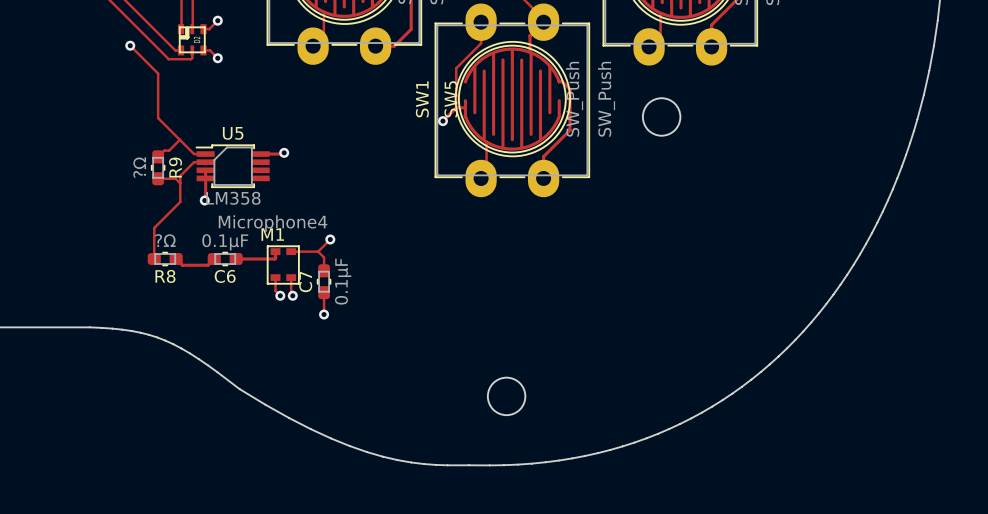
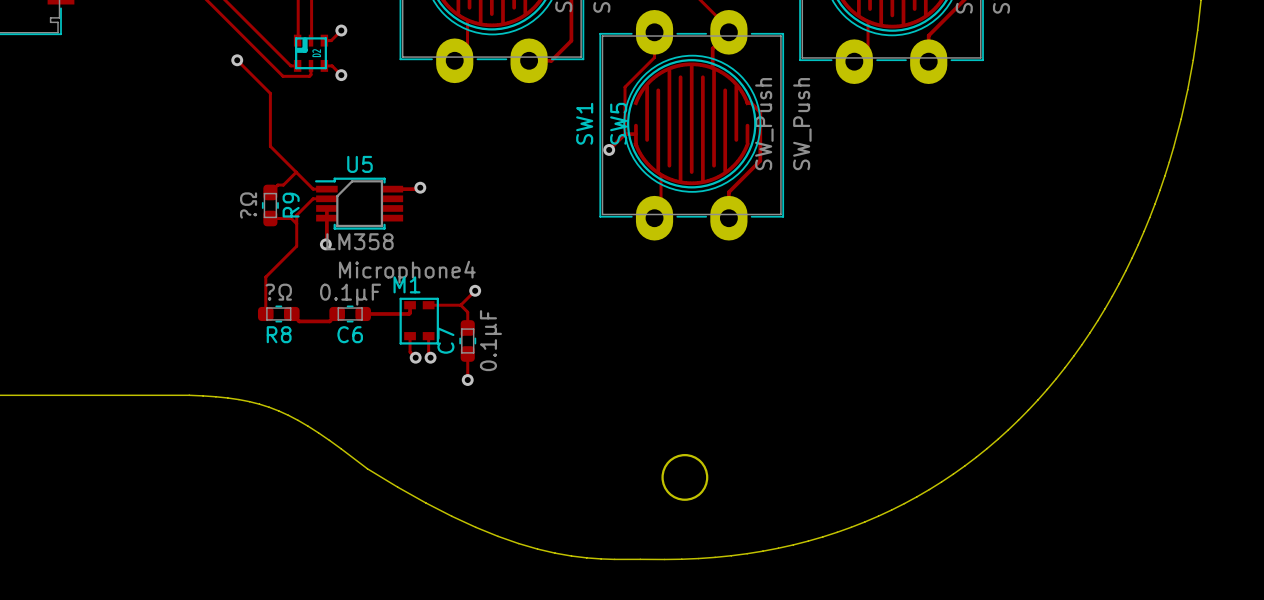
round board edge: [641, 97, 682, 137] -> none

